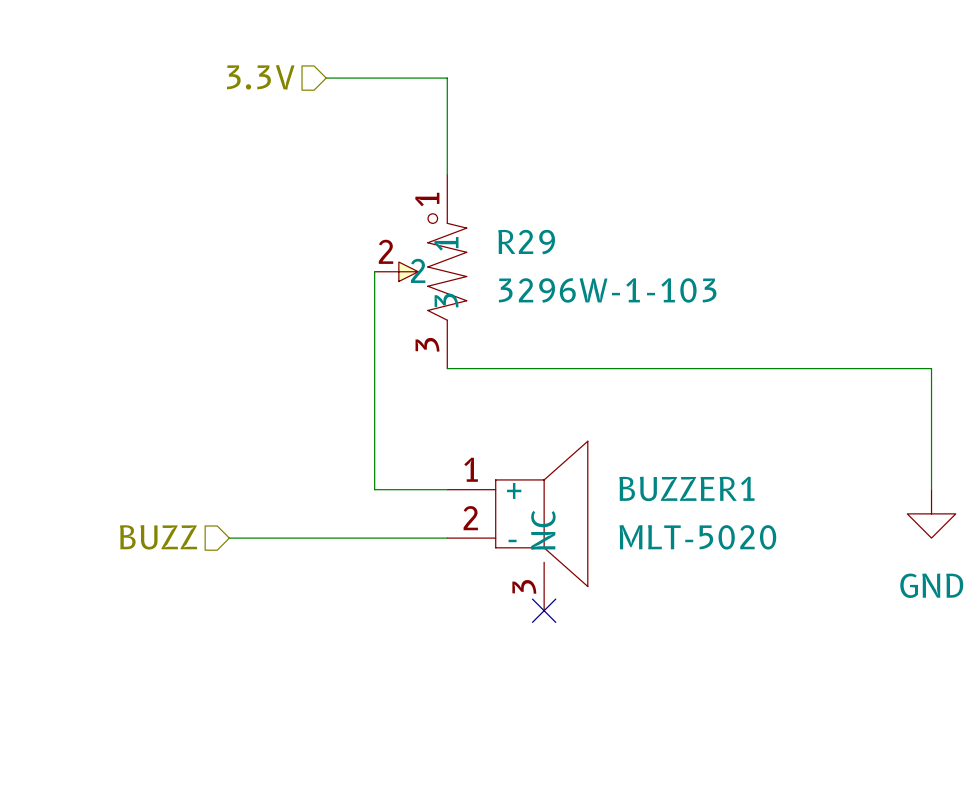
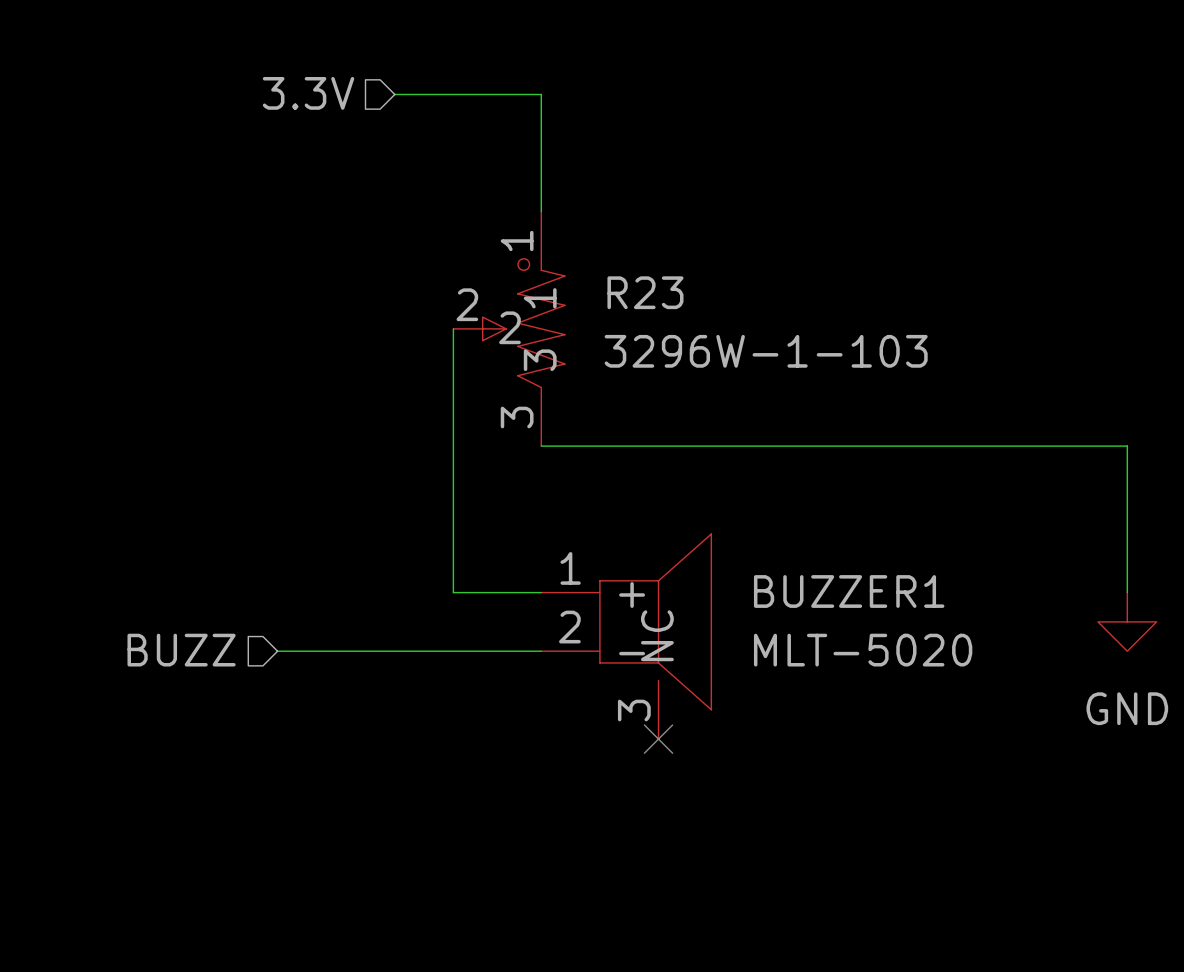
R29 name: R29 (526, 242) -> R23 (645, 292)

